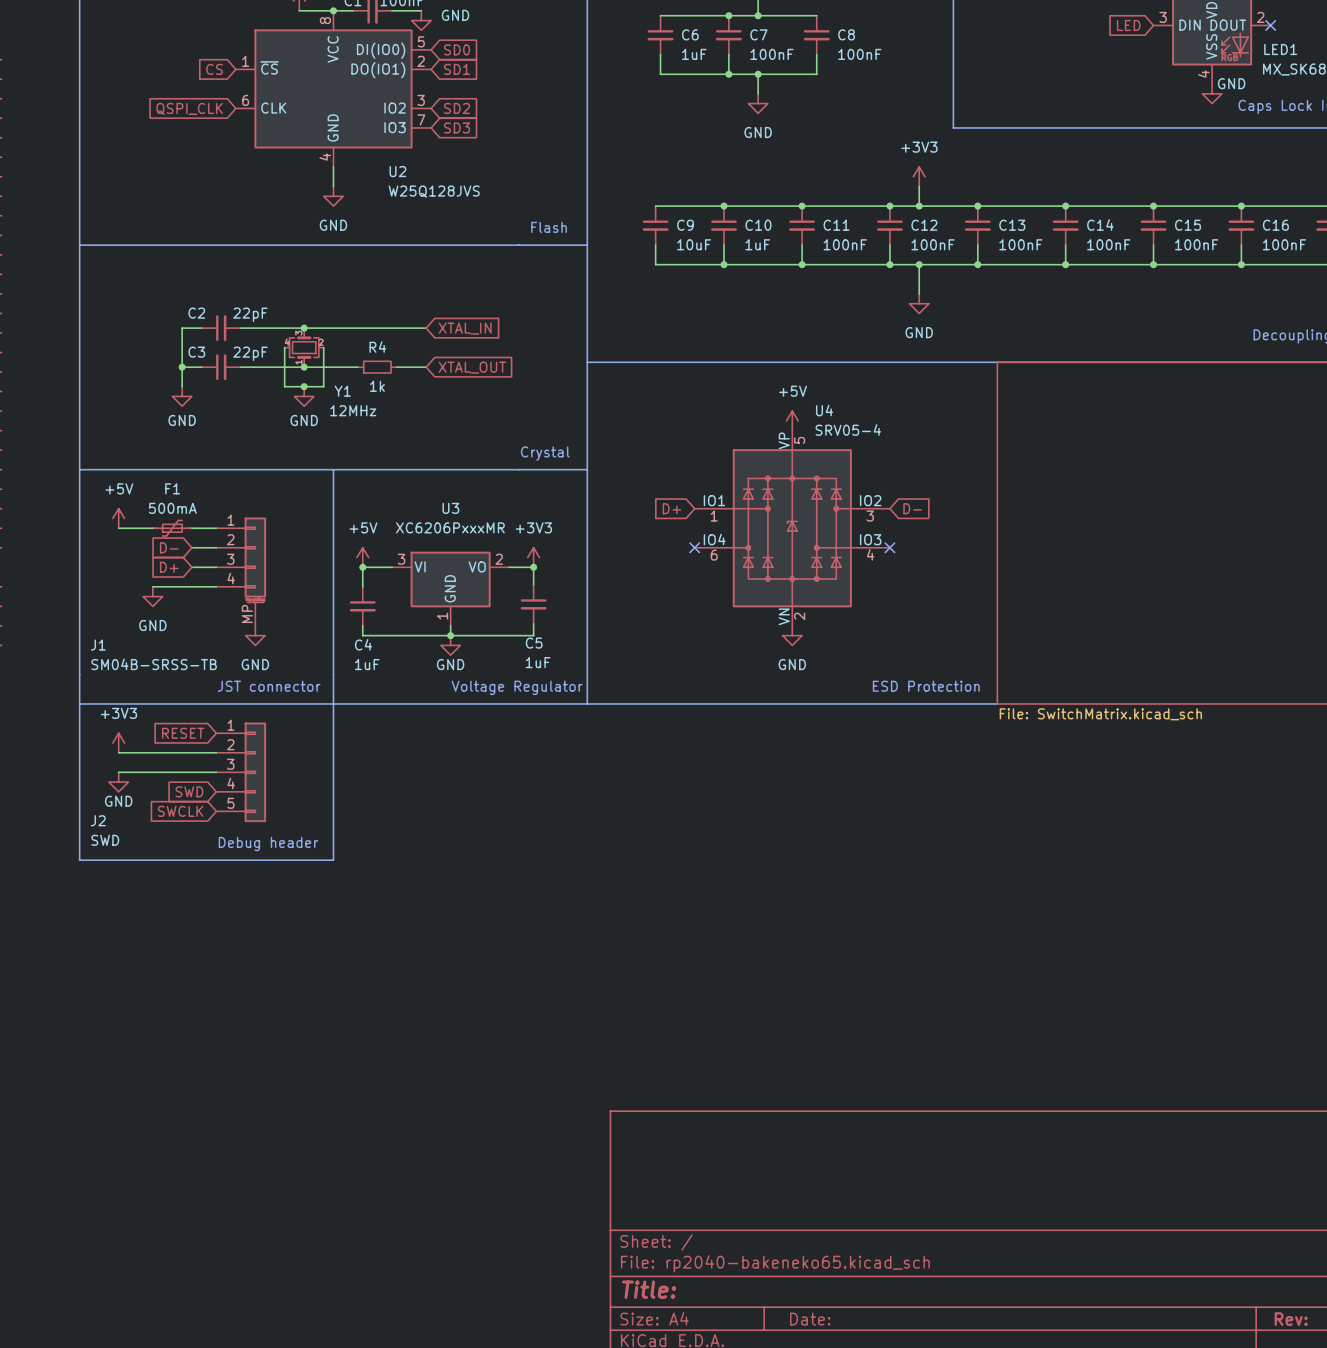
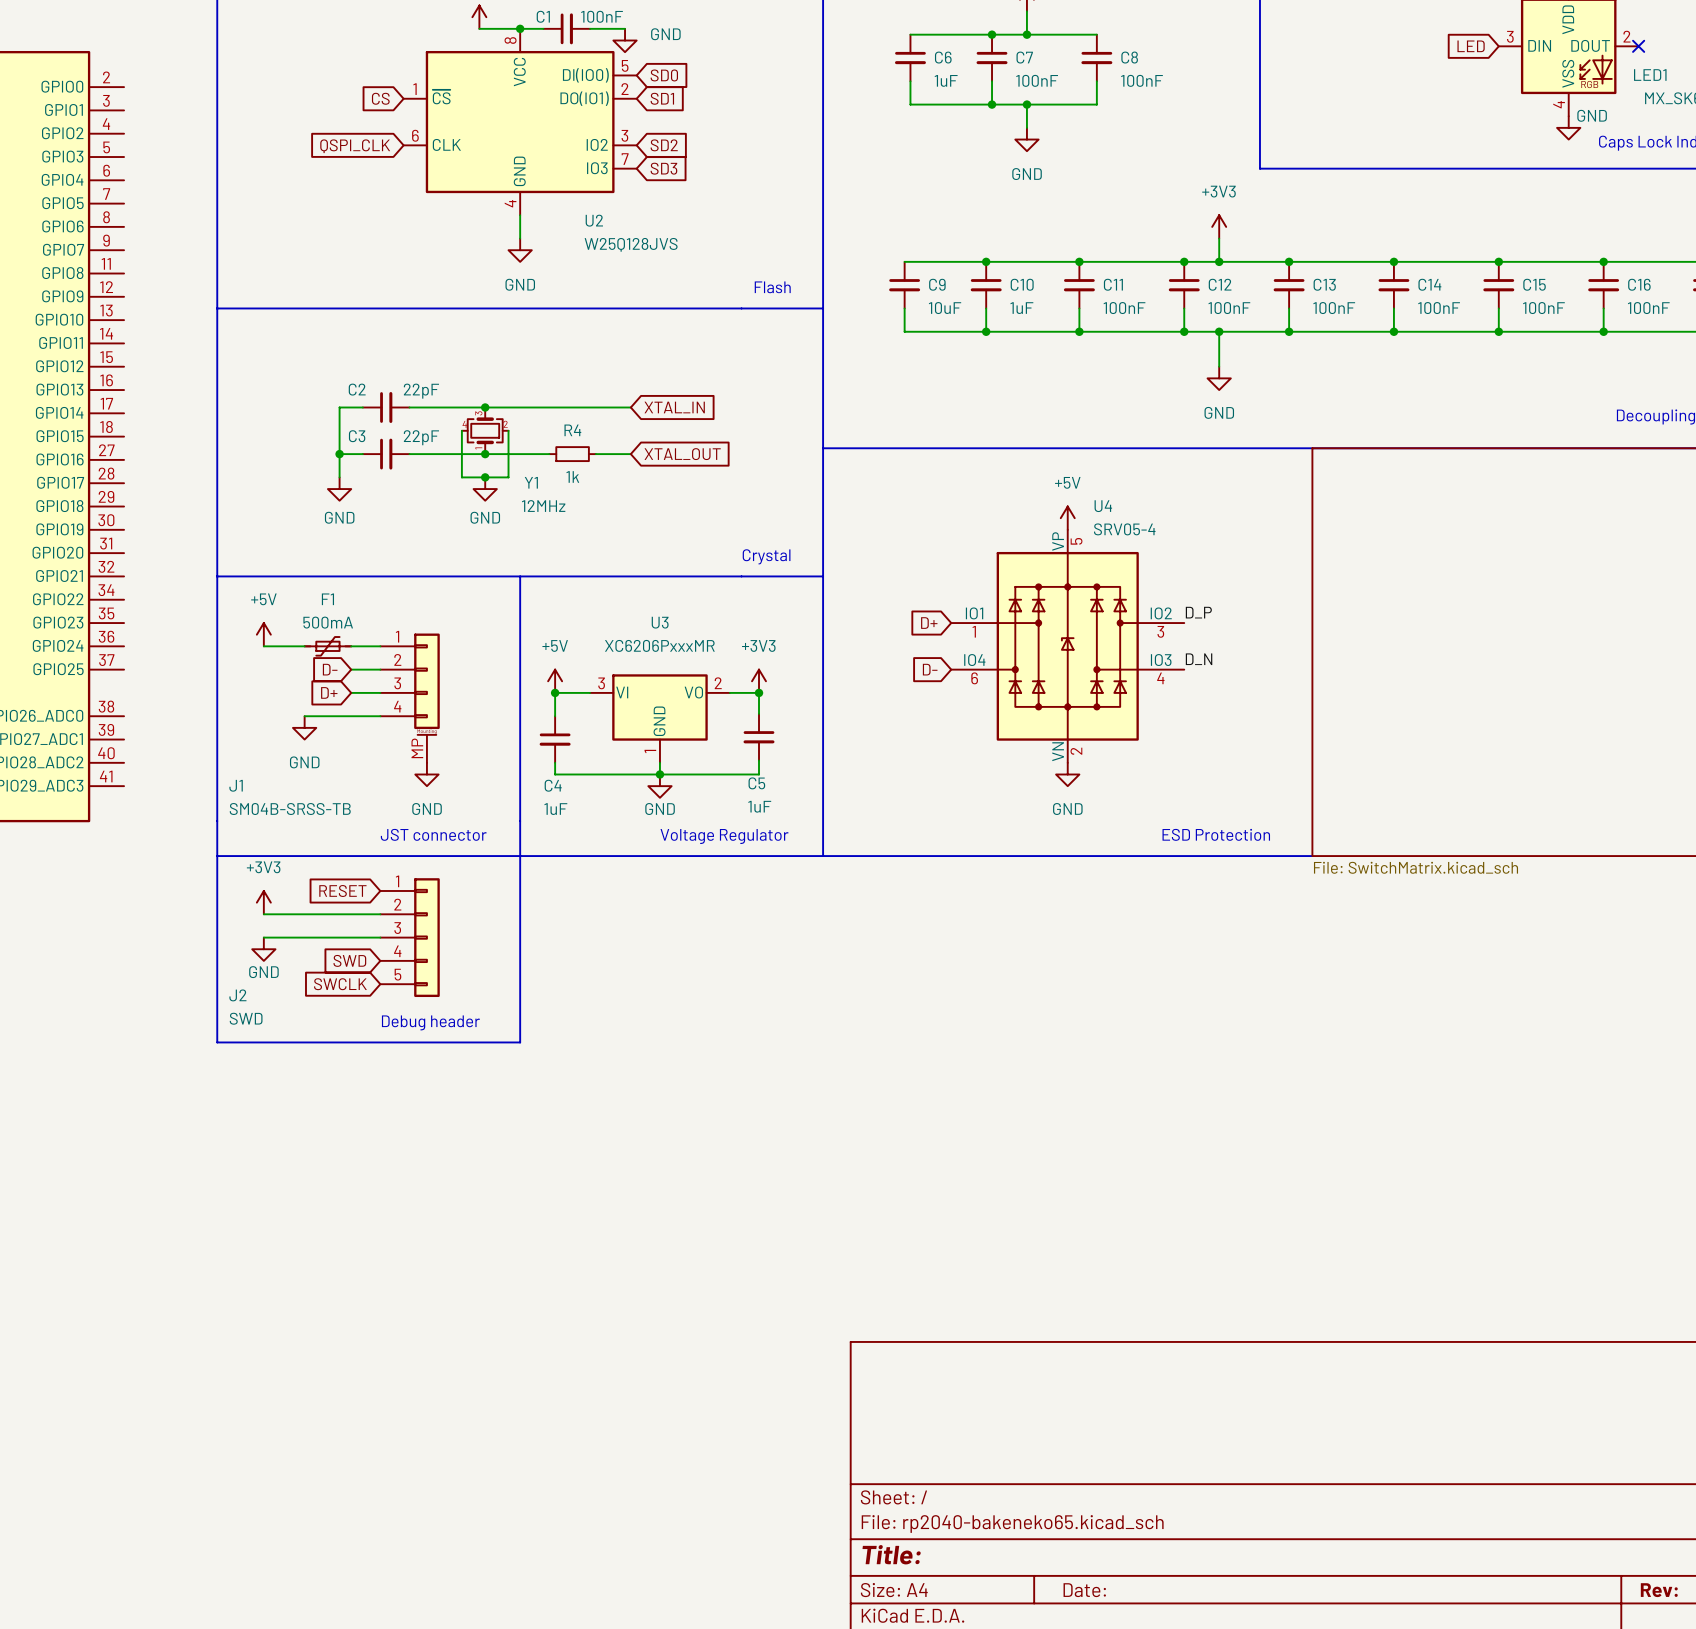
label: none -> D_P (1198, 612)
global label: D- (912, 508) -> none
label: none -> D_N (1199, 659)
global label: none -> D- (930, 669)
no-connect mark: (694, 547) -> none
no-connect mark: (889, 547) -> none

